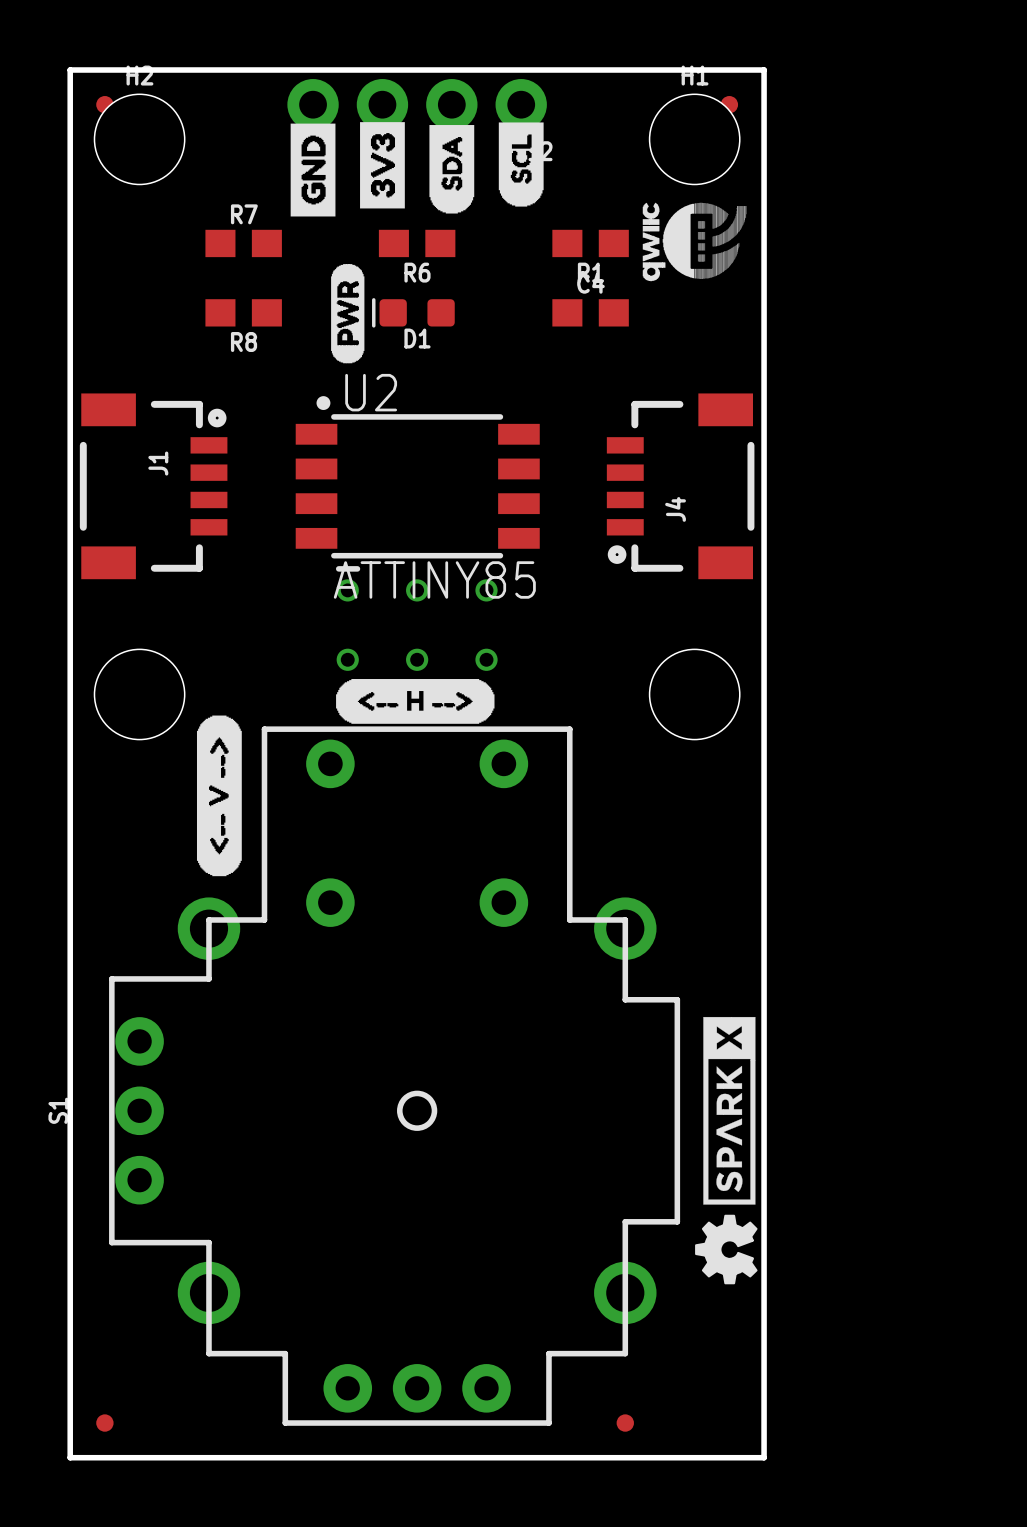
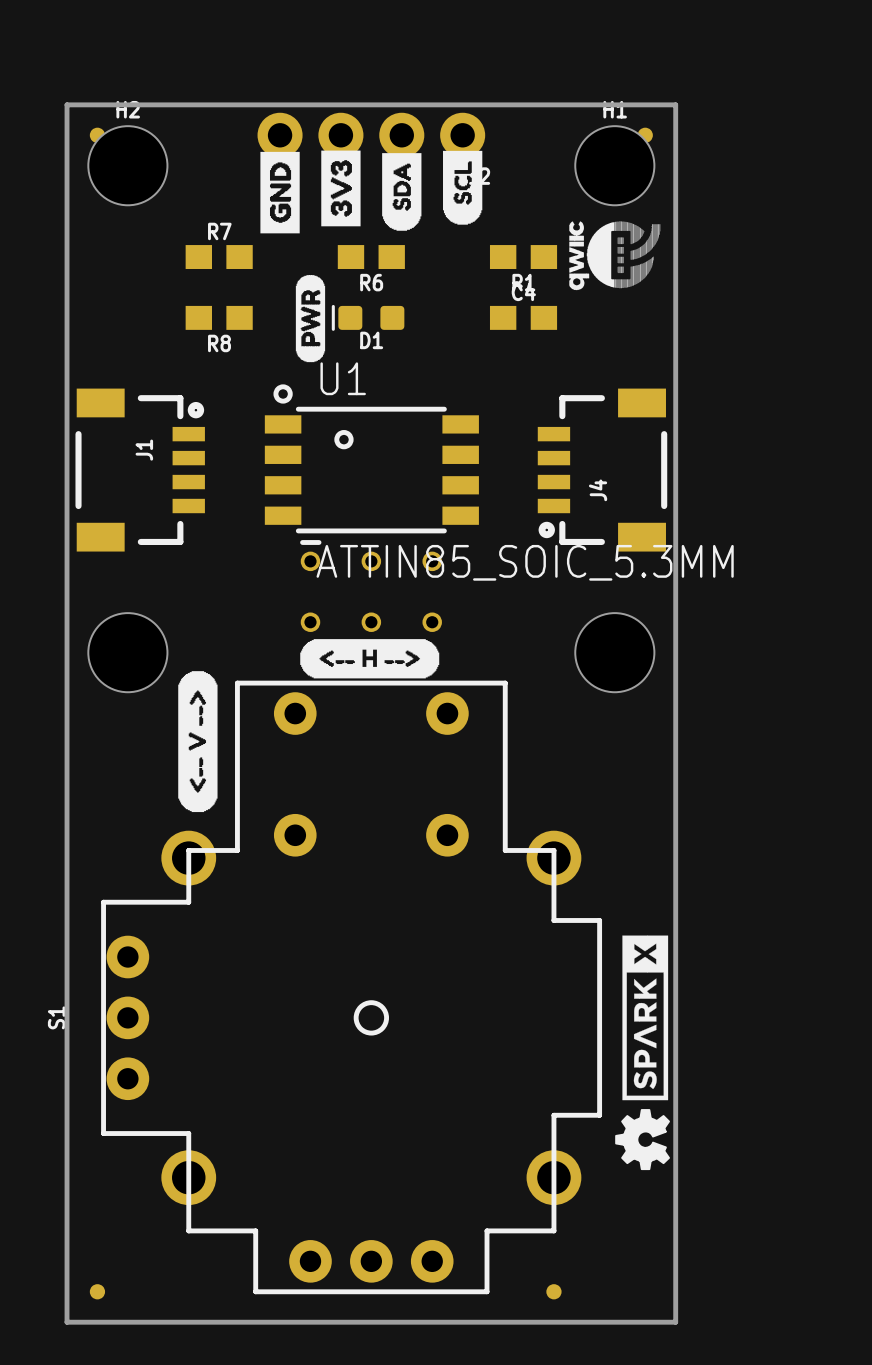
U1: none -> ATTIN85_SOIC_5.3MM (371, 458)
U2: ATTINY85 (417, 477) -> none

